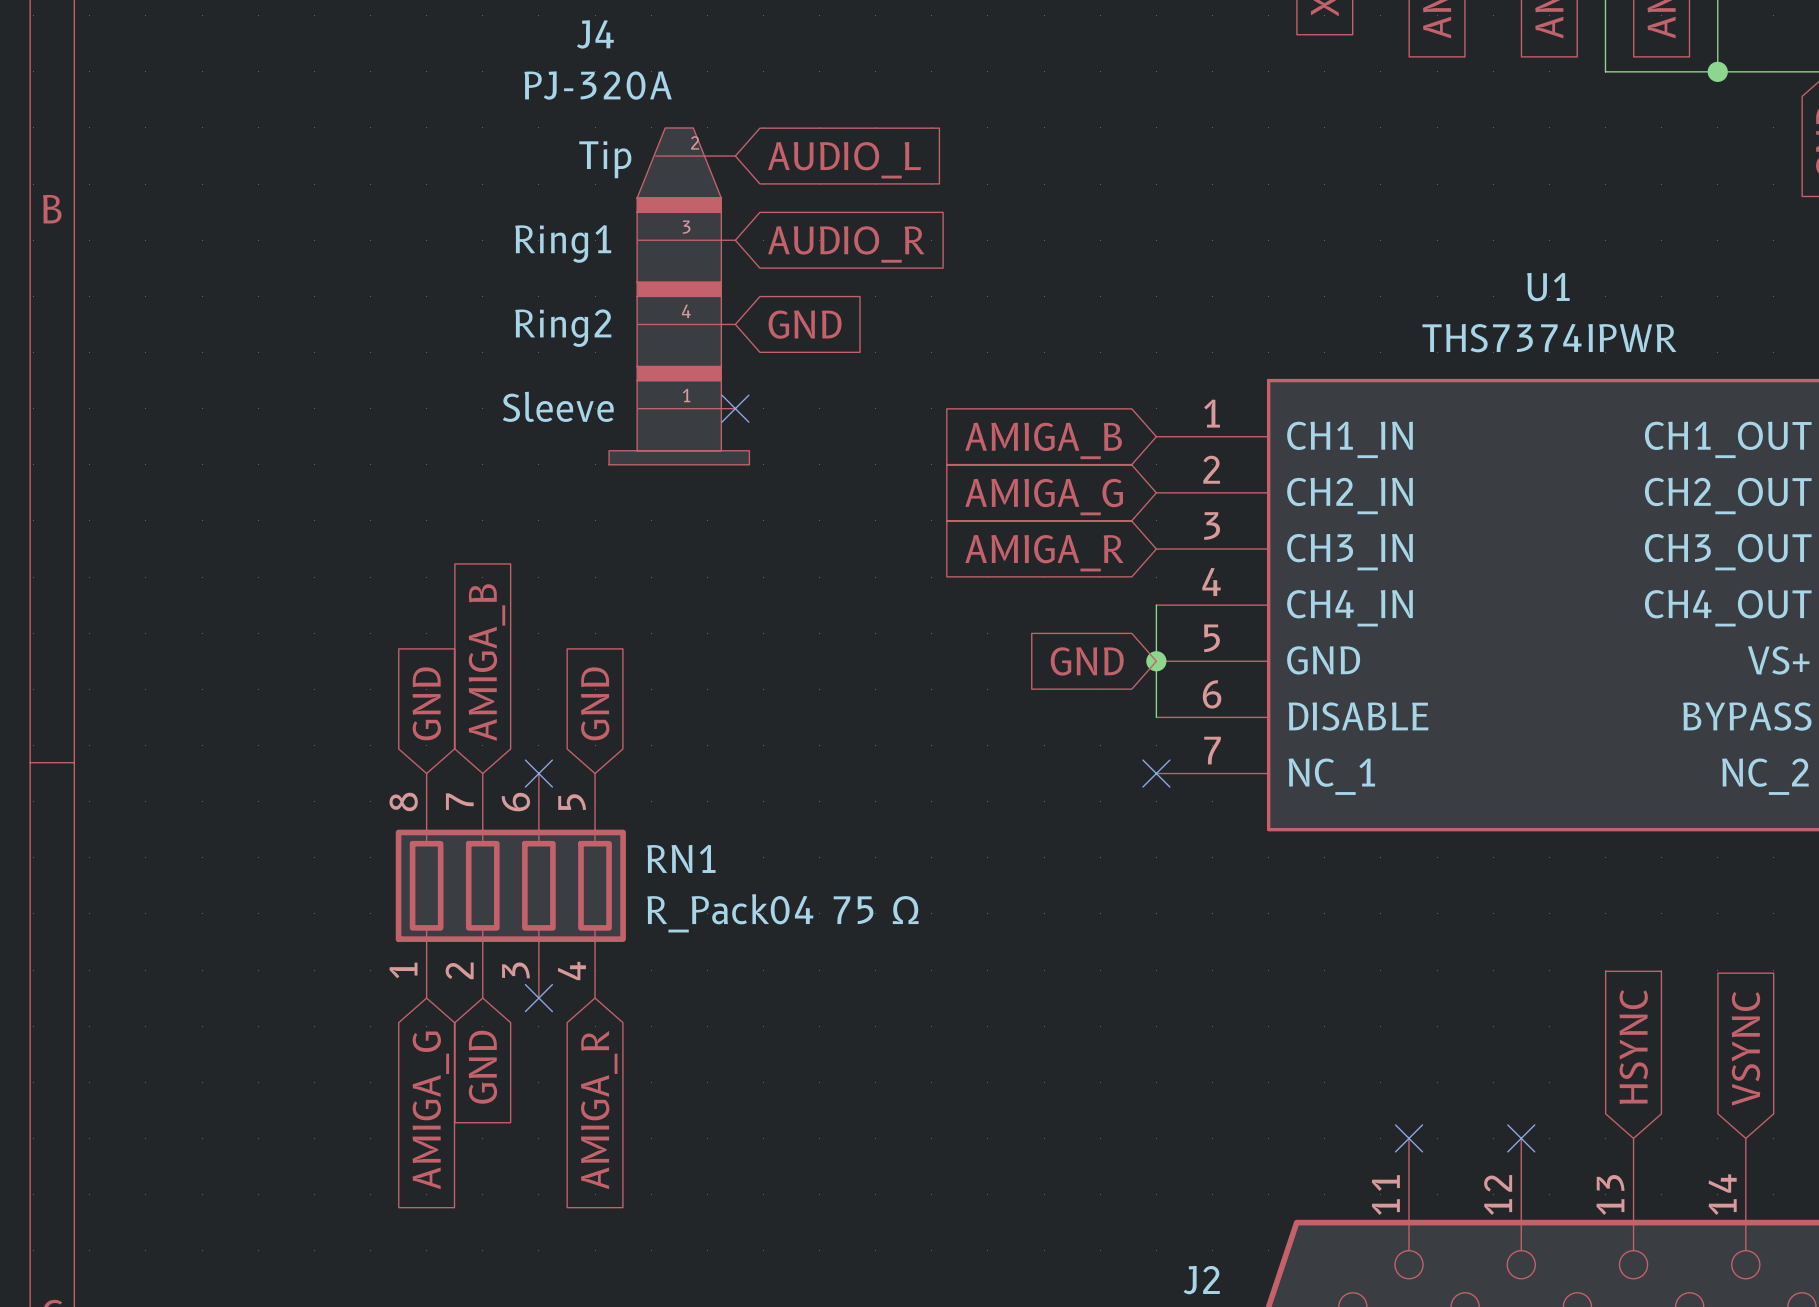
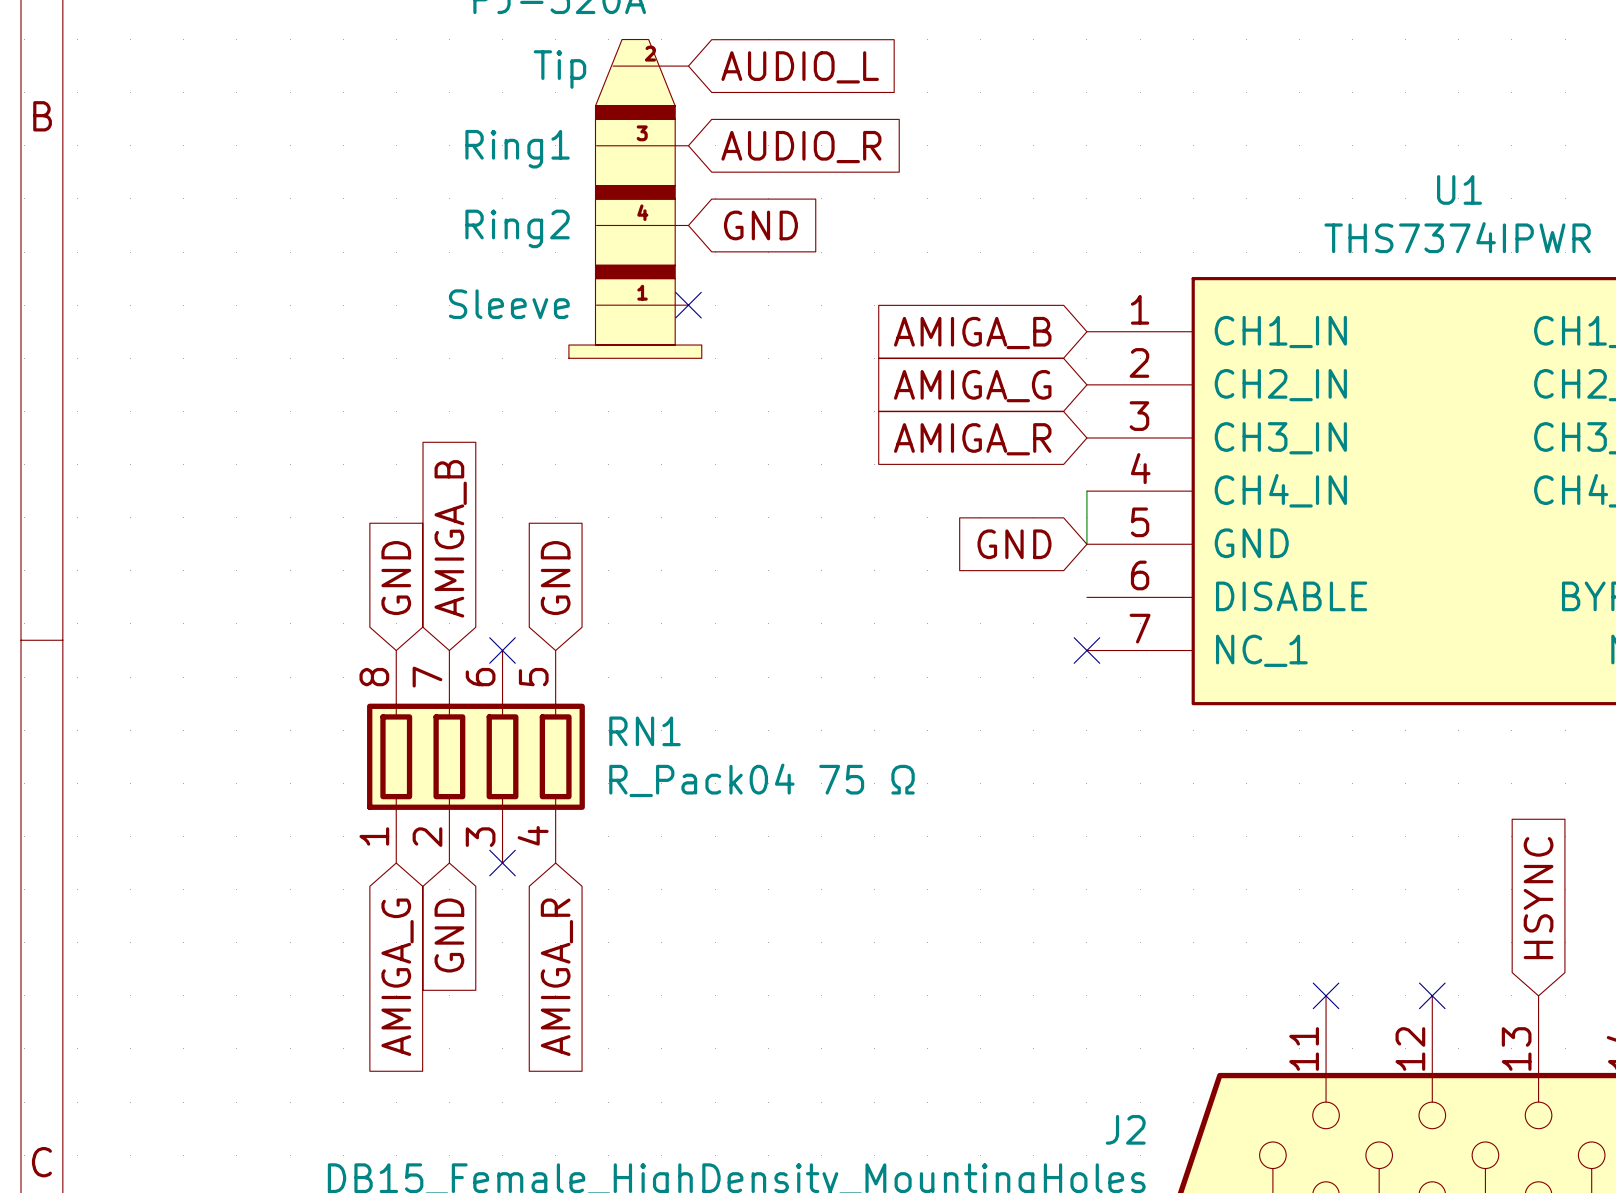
wire: (1156, 661) (1156, 717) -> none
junction: (1156, 661) -> none

